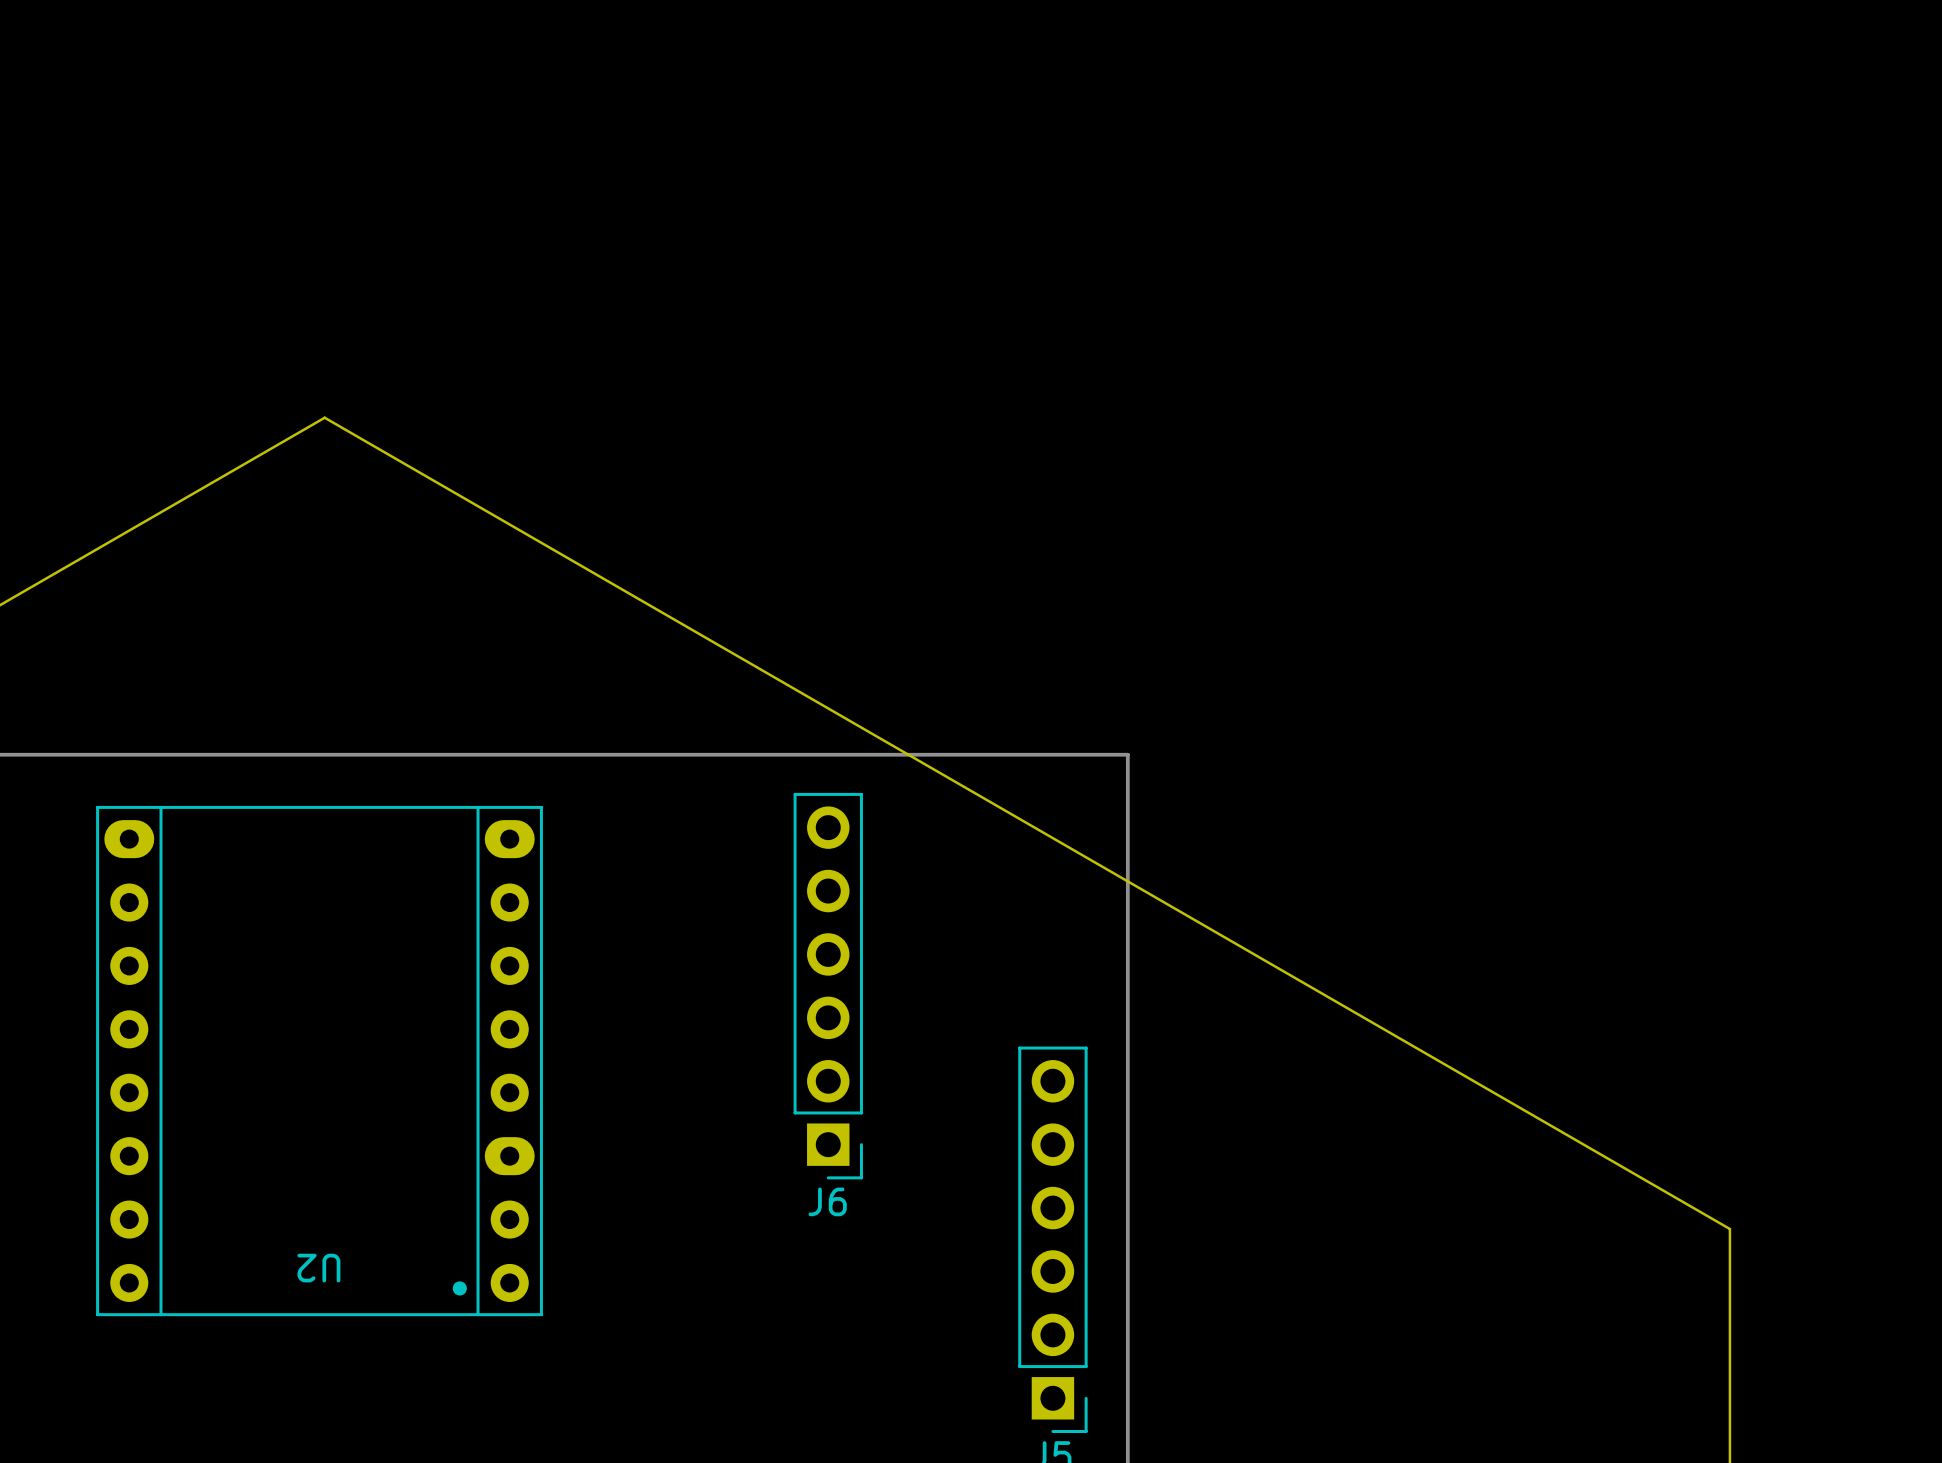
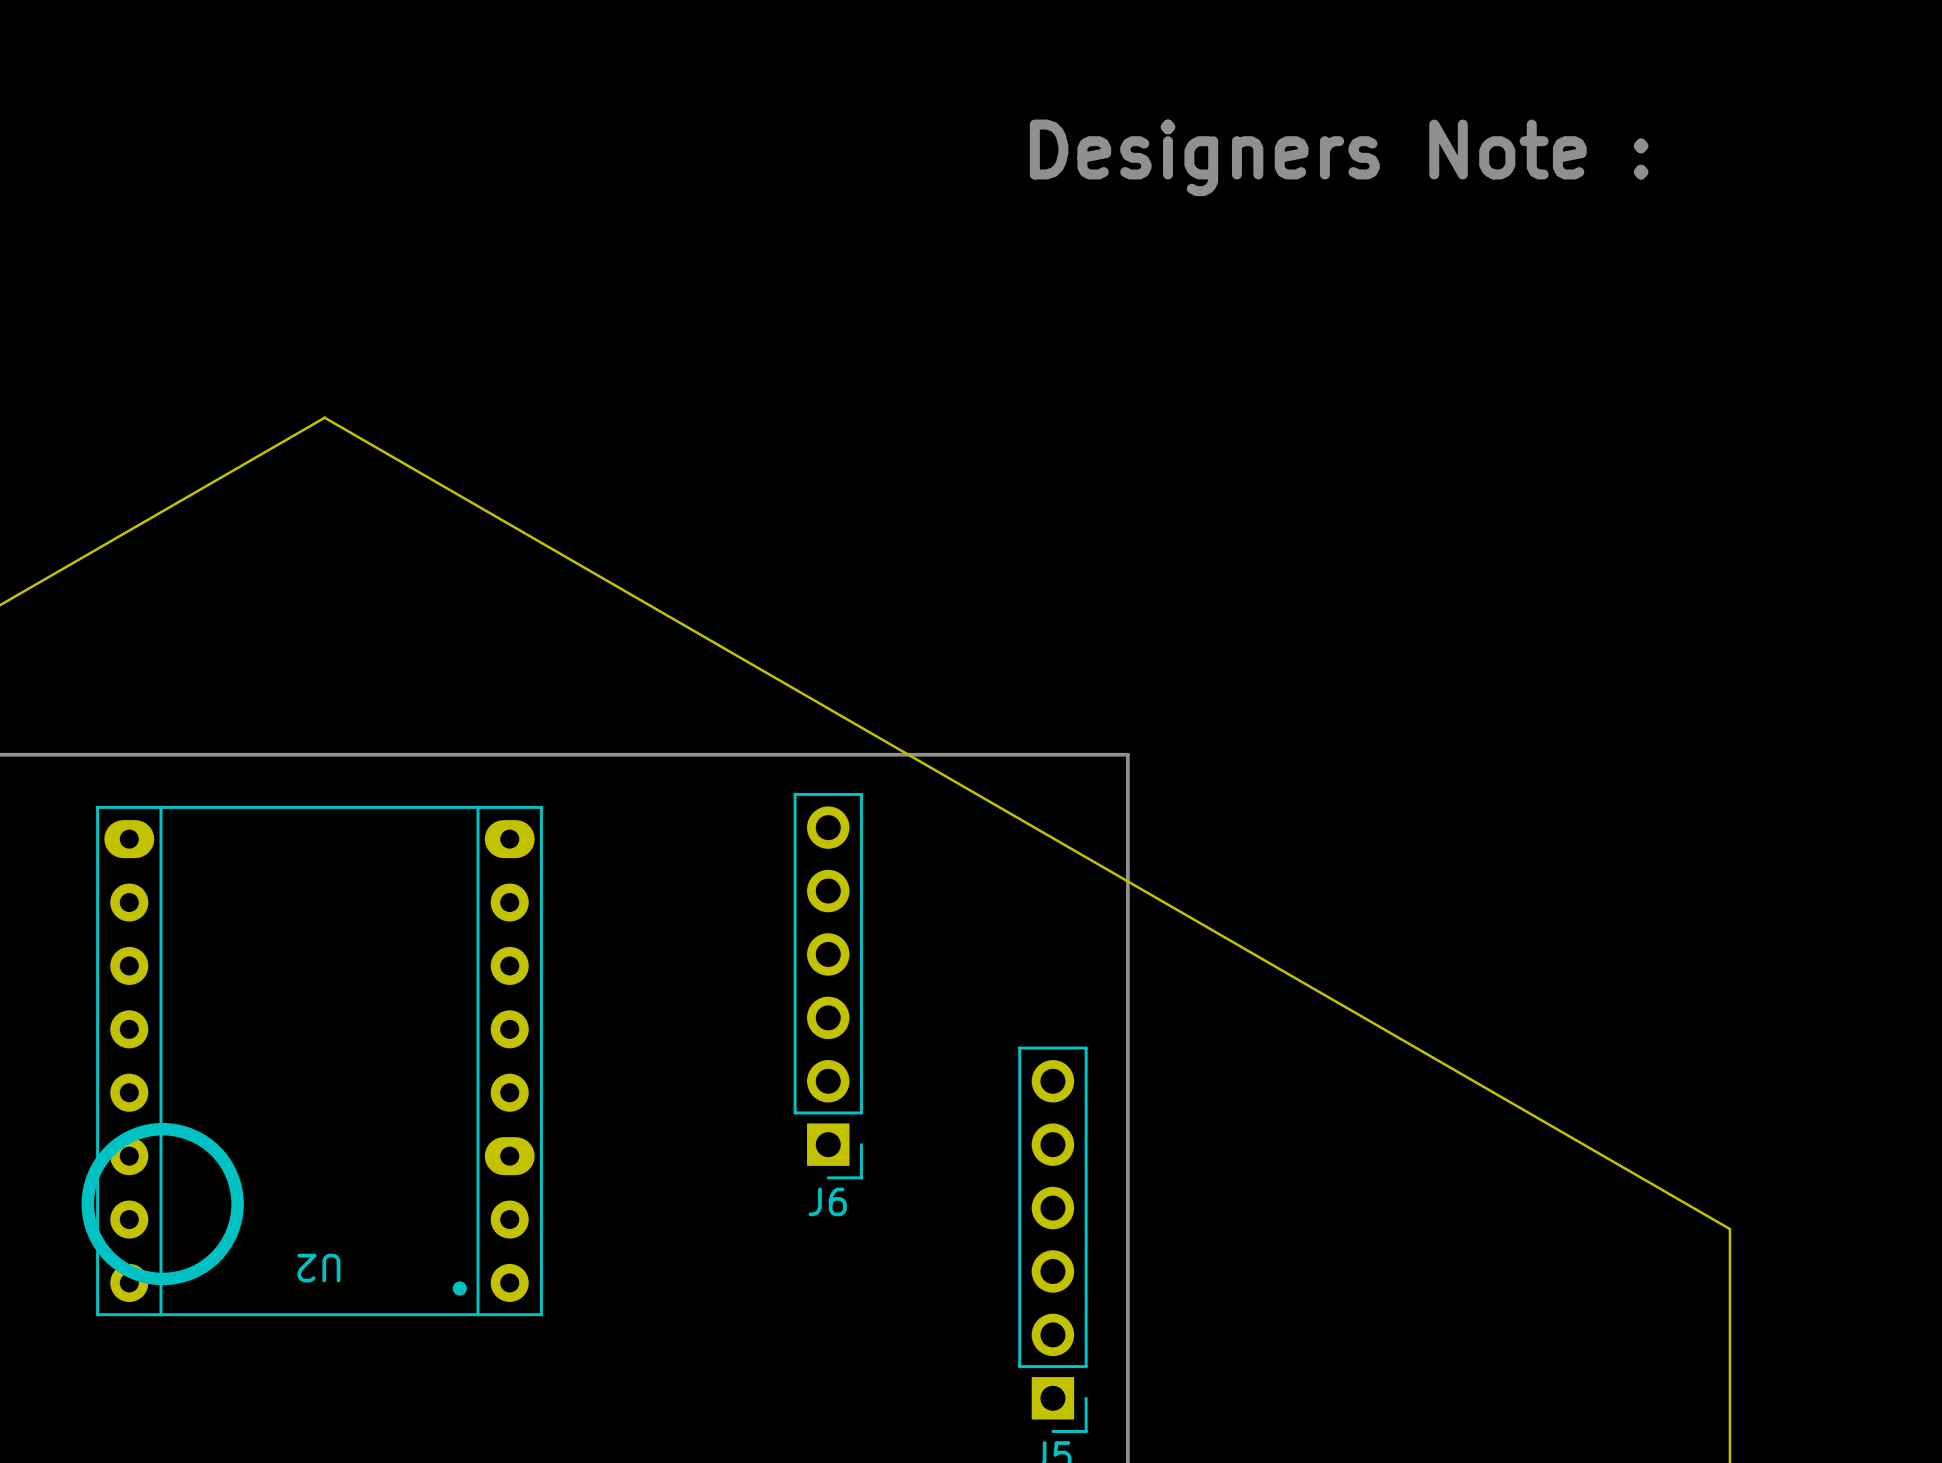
text: none -> Designers Note : (1339, 157)
drawing: none -> [81, 1122, 244, 1286]

